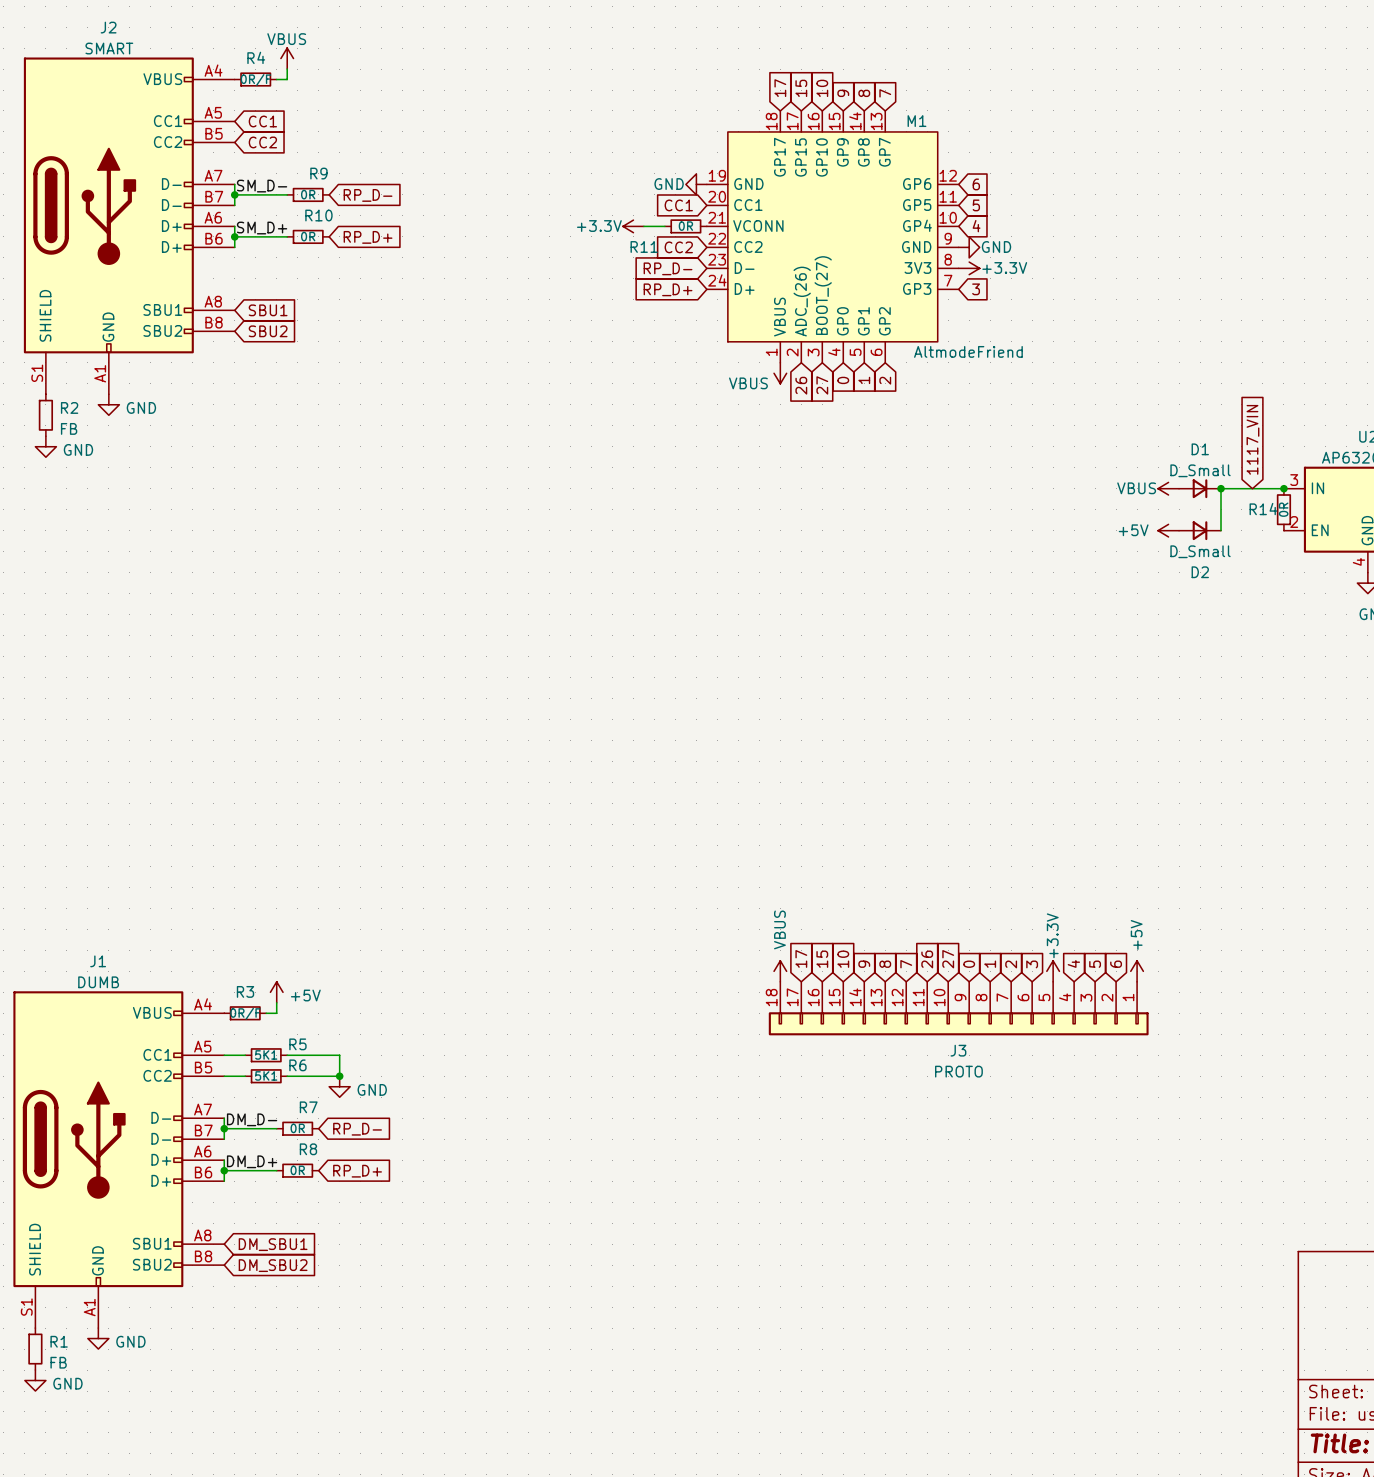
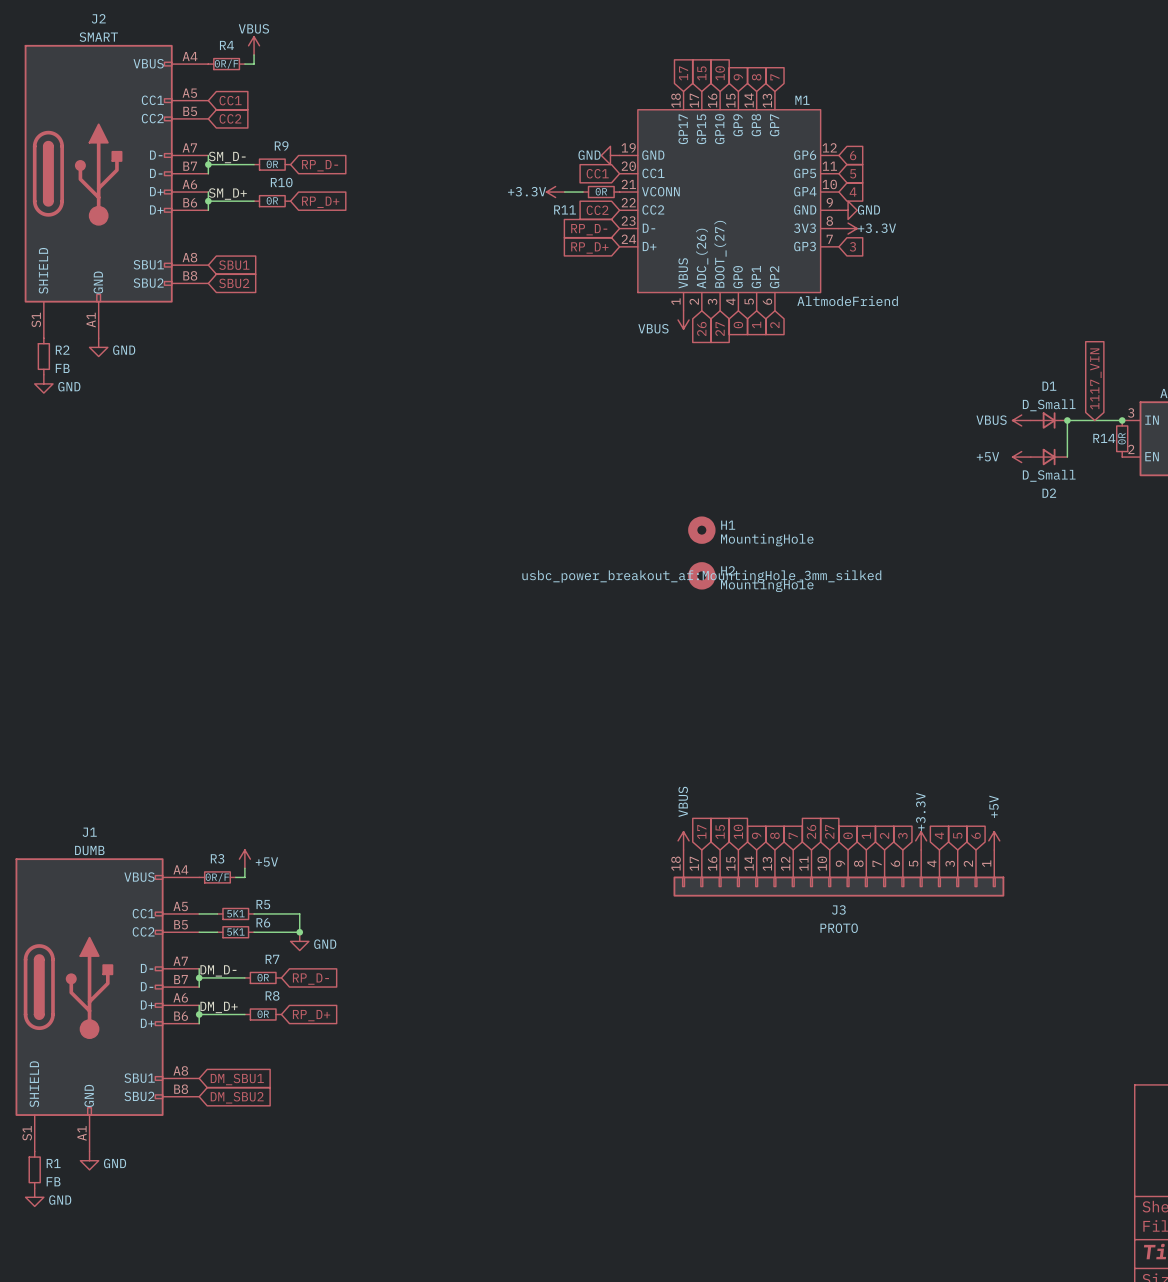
H1: none -> MountingHole (701, 530)
H2: none -> MountingHole (701, 575)

